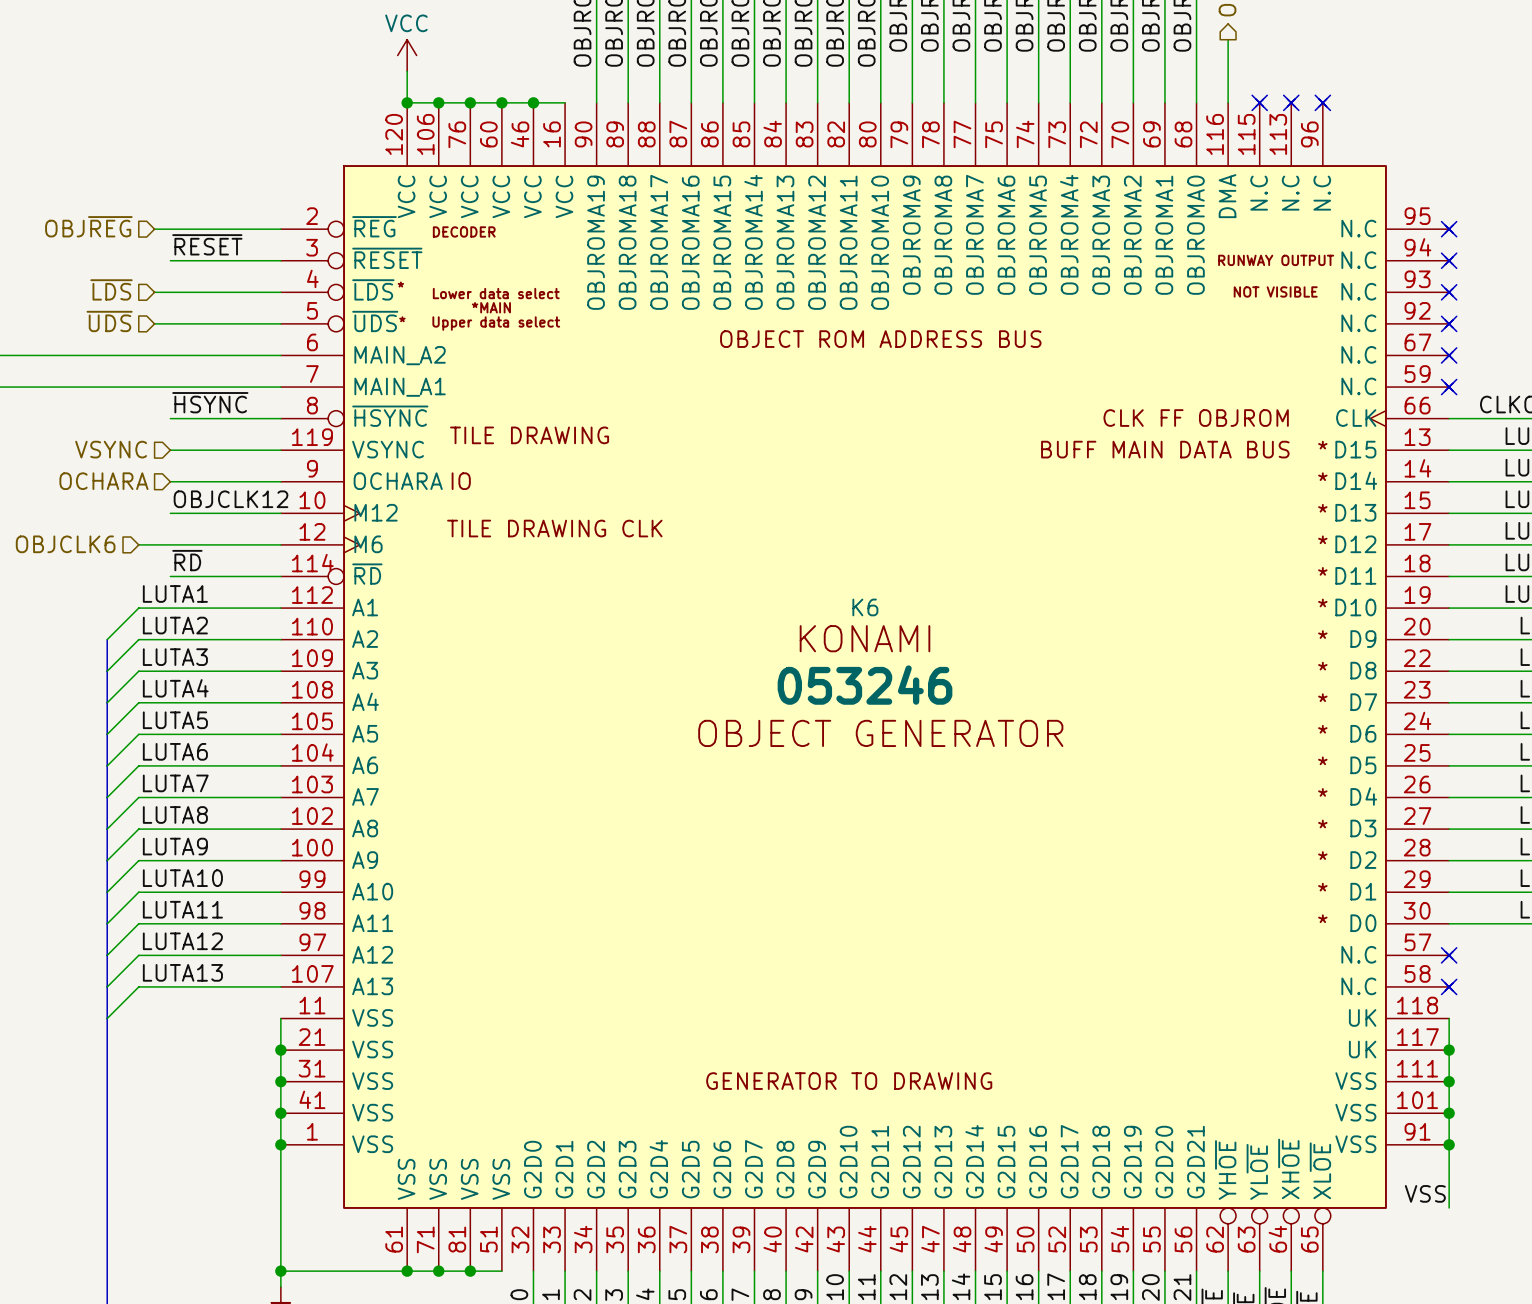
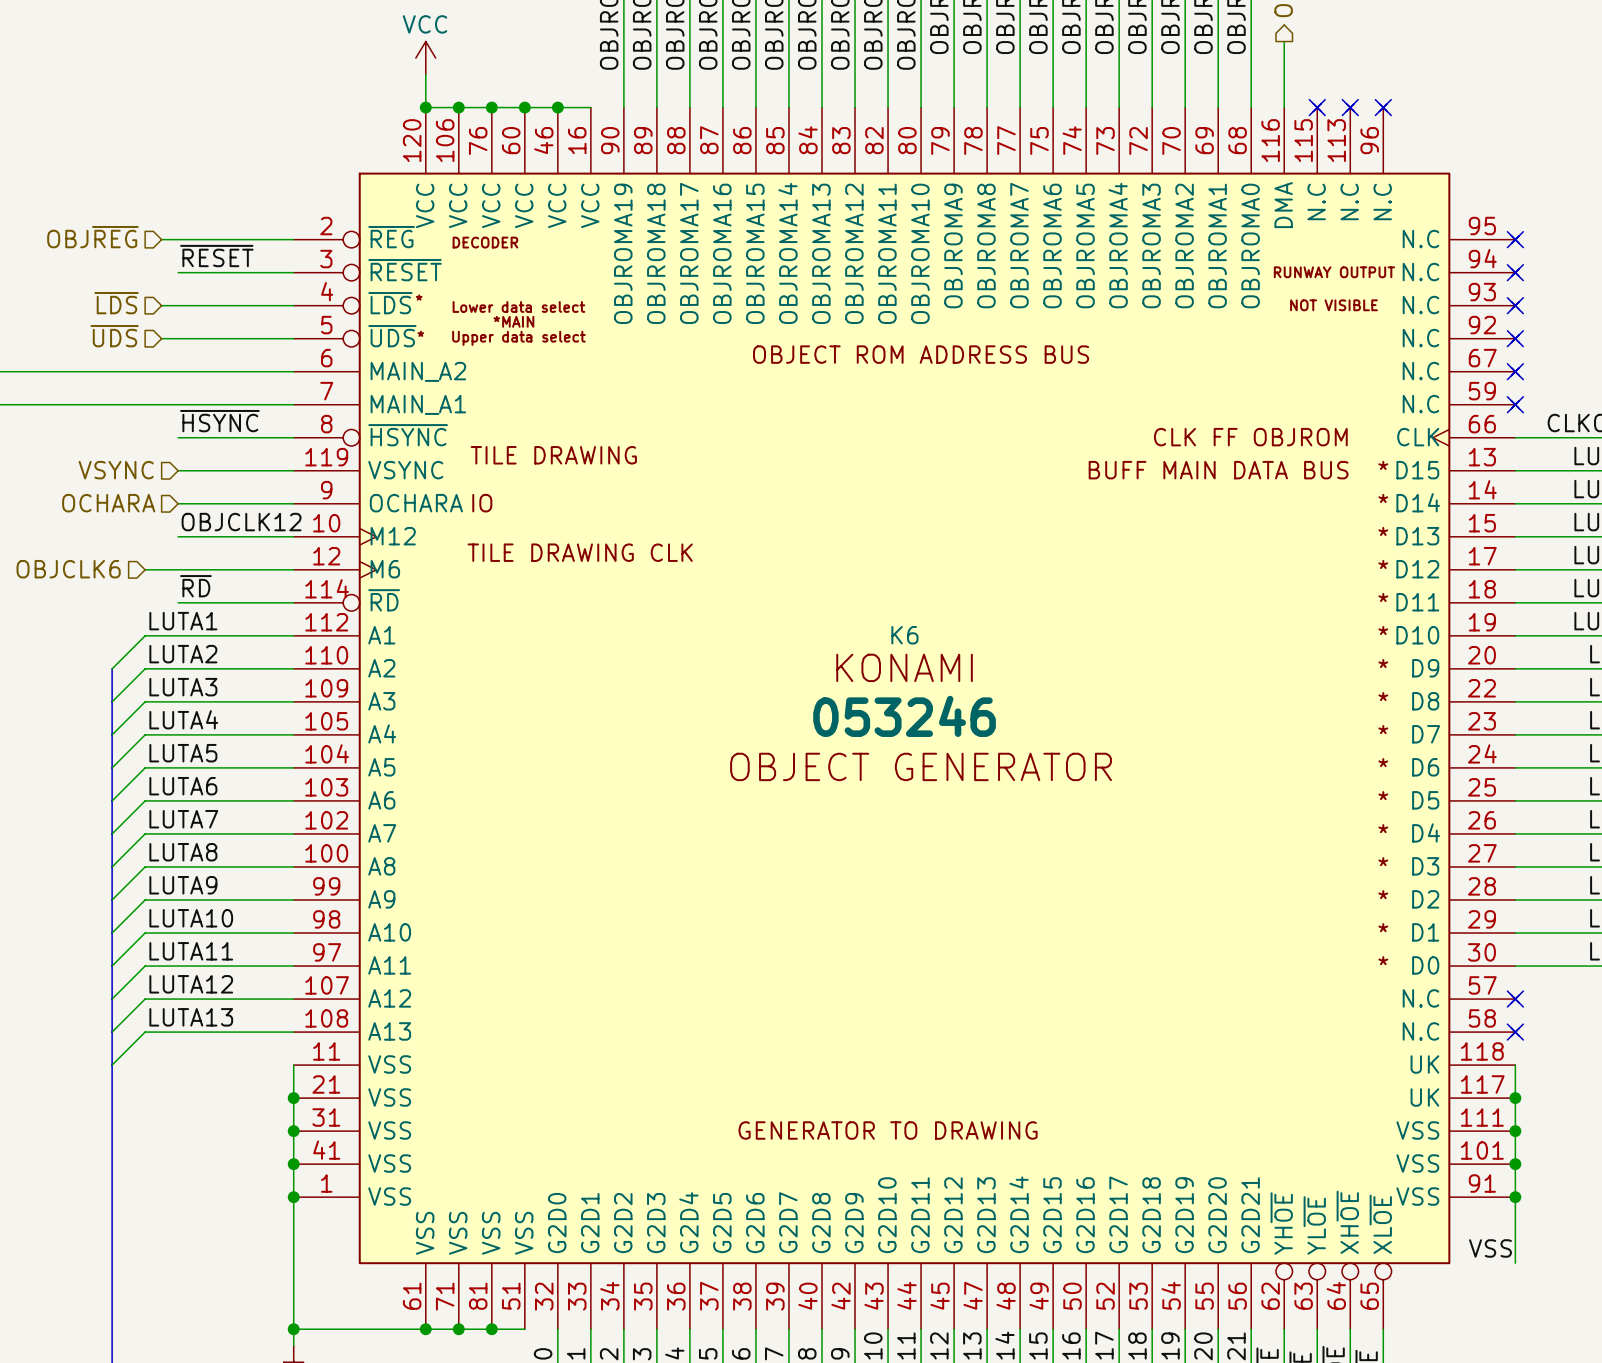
K6 symbol: [280, 99, 1453, 1272] -> [293, 103, 1520, 1330]

